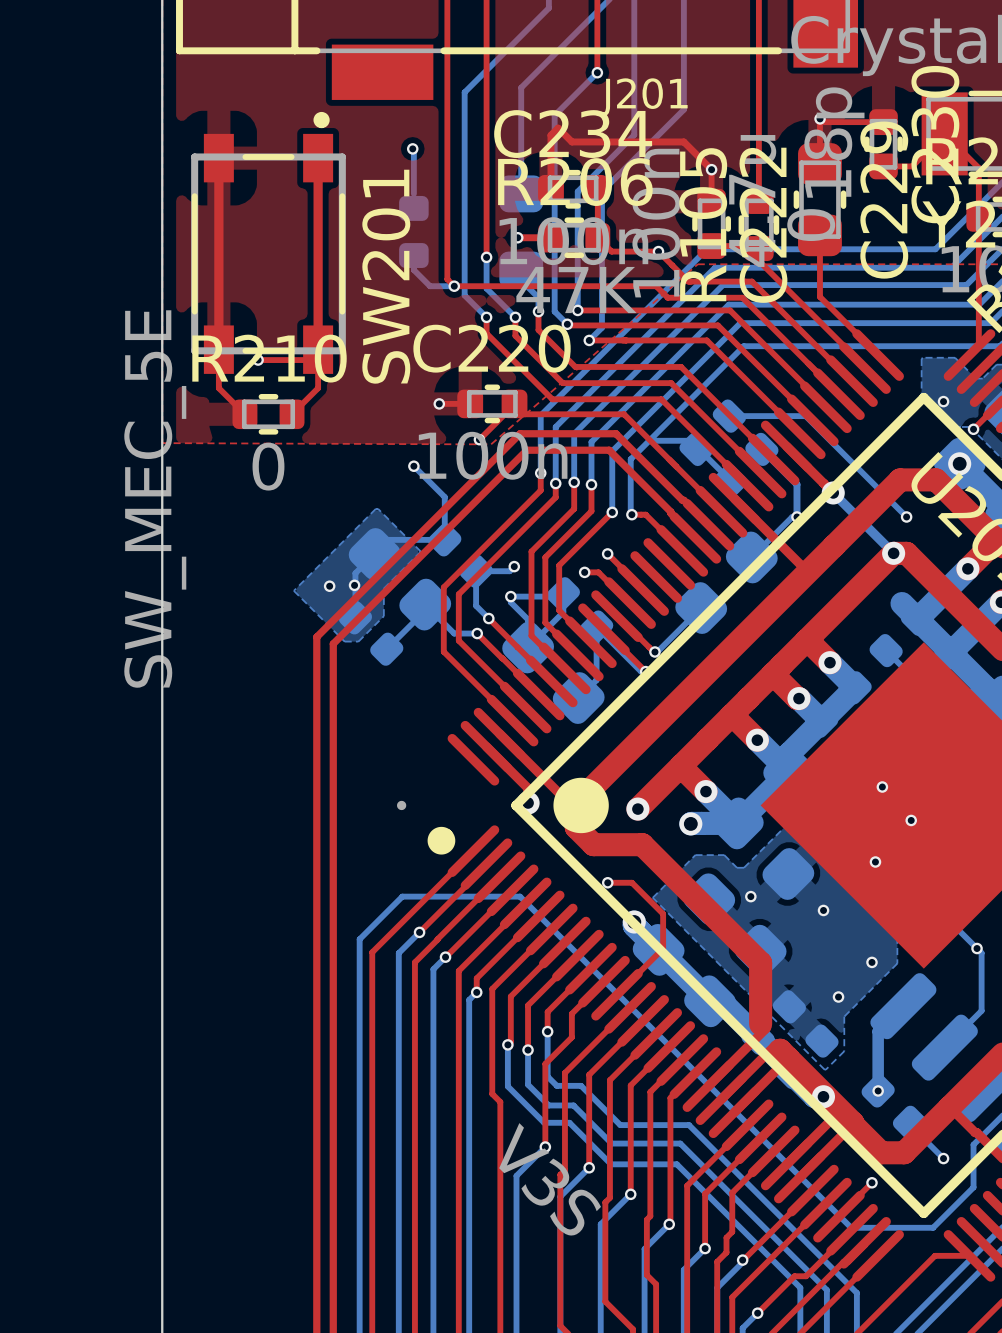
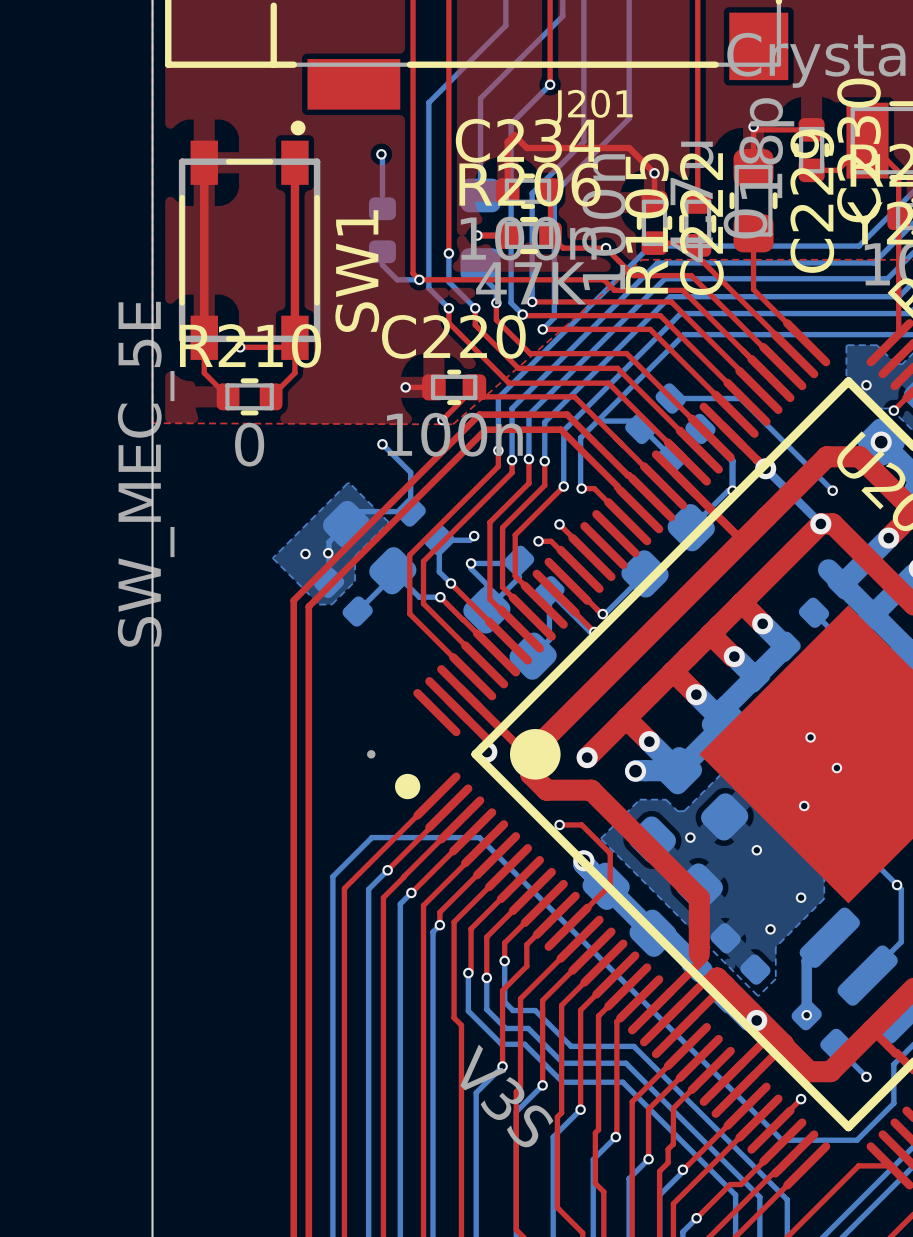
SW201 name: SW201 (386, 276) -> SW1 (357, 271)

